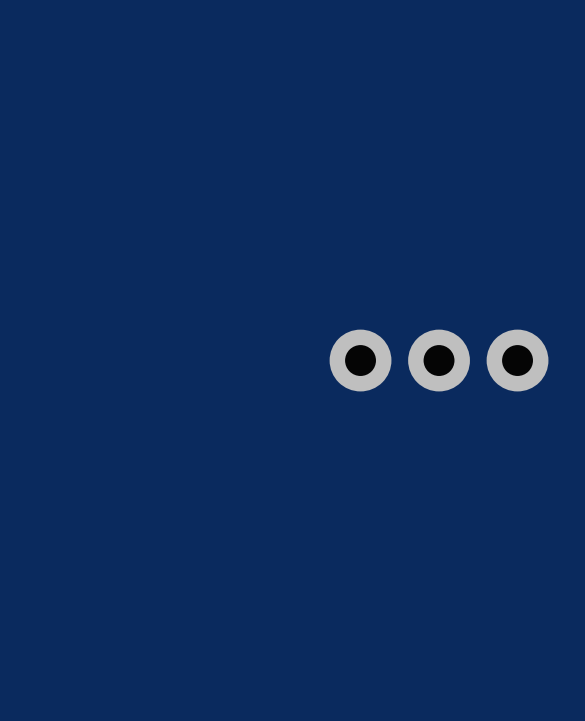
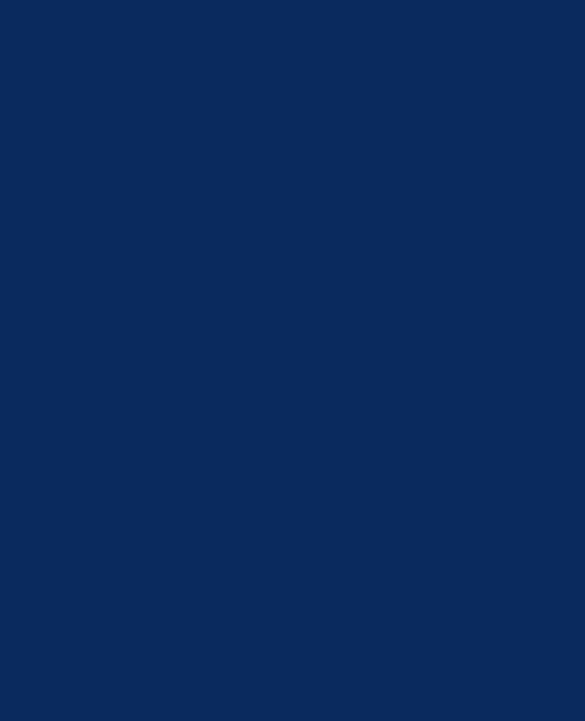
via: (360, 360) -> none
via: (439, 360) -> none
via: (517, 360) -> none

